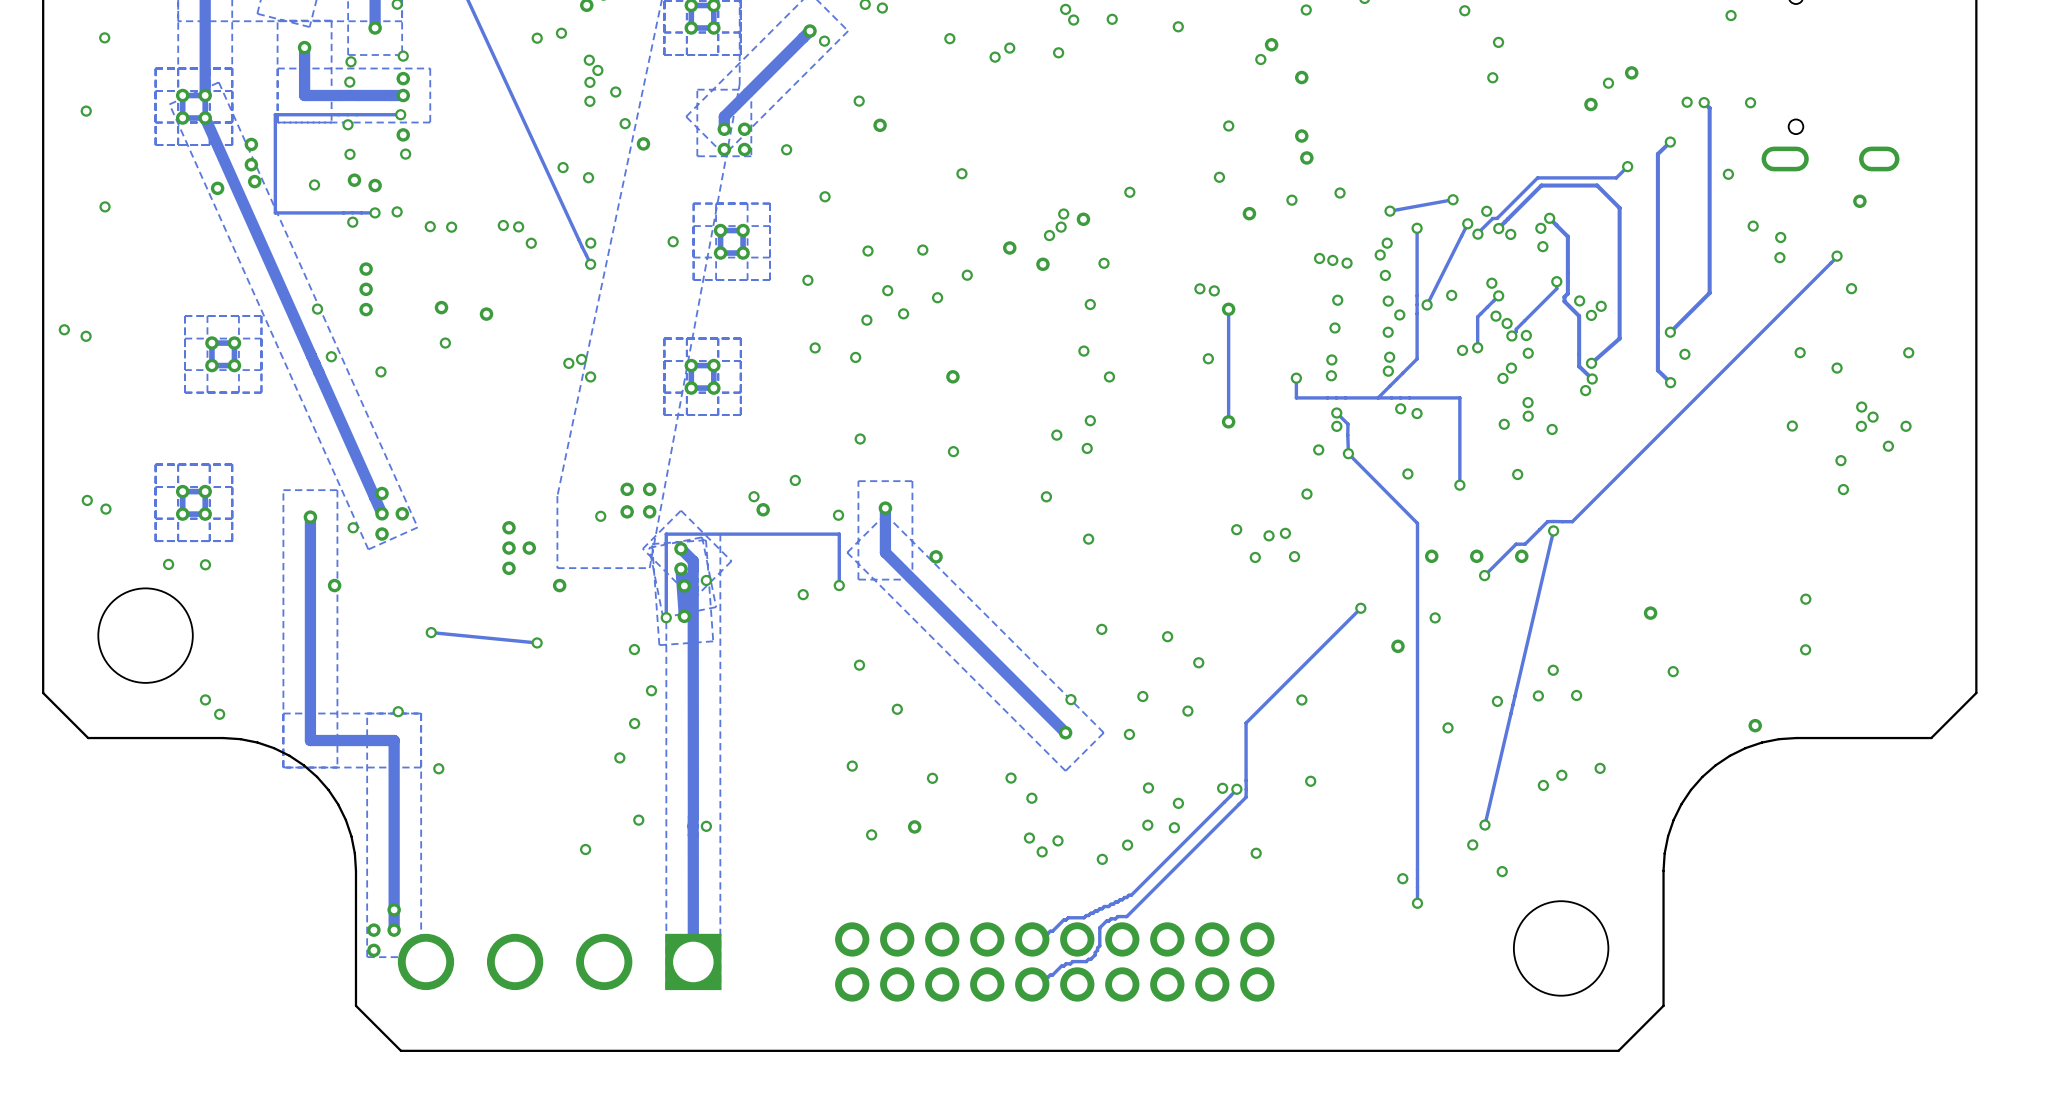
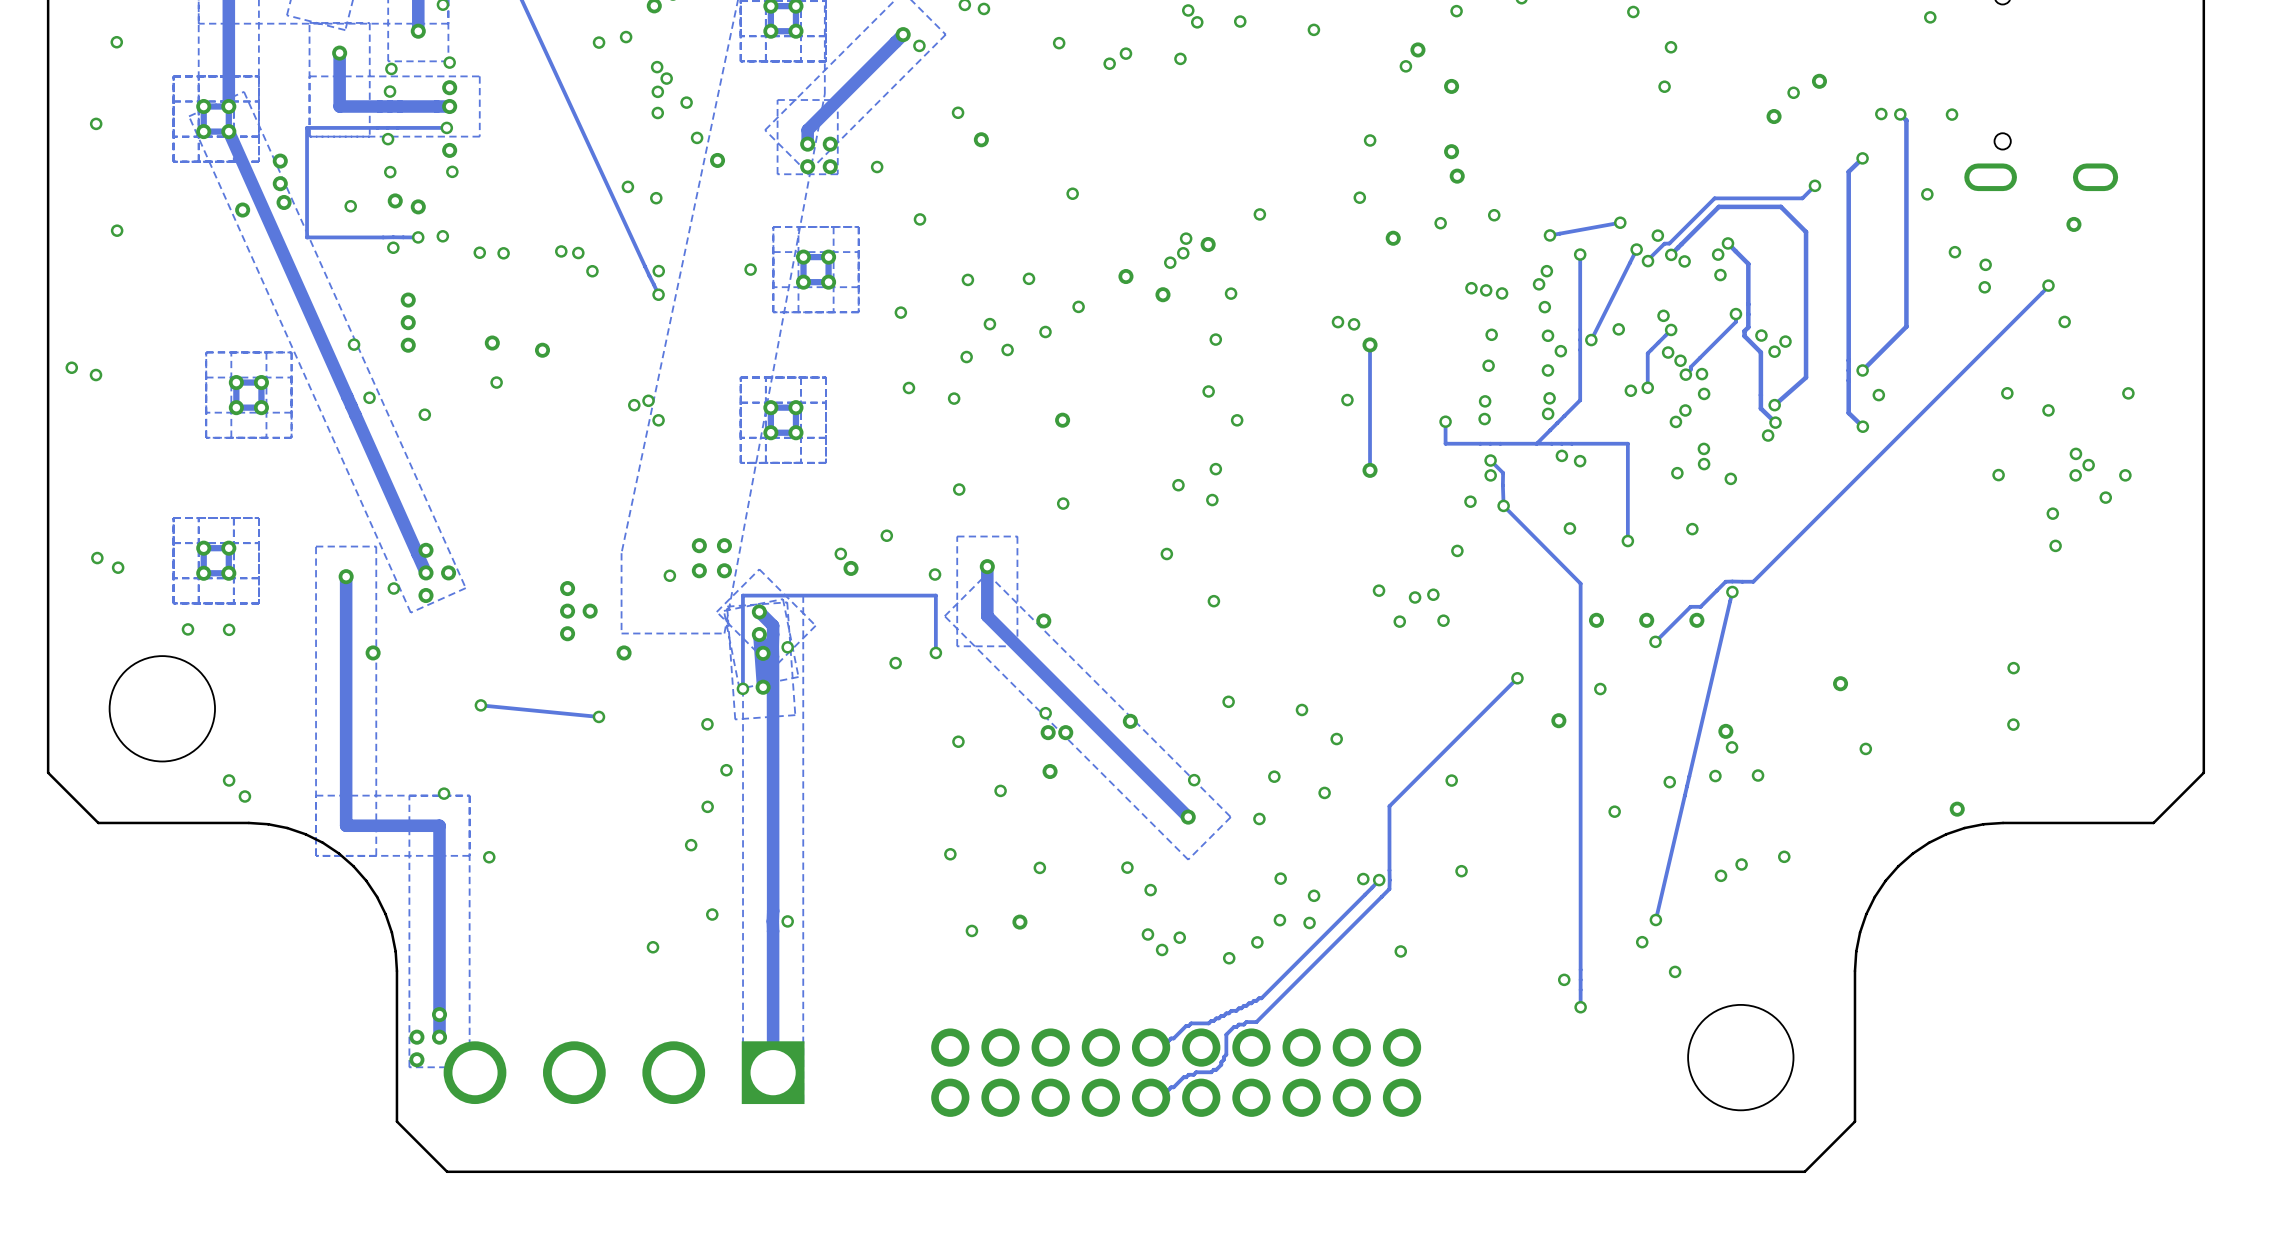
via: none -> (1045, 713)
via: none -> (1130, 721)
via: none -> (1725, 731)
via: none -> (1048, 732)
via: none -> (1065, 732)
via: none -> (1050, 771)

